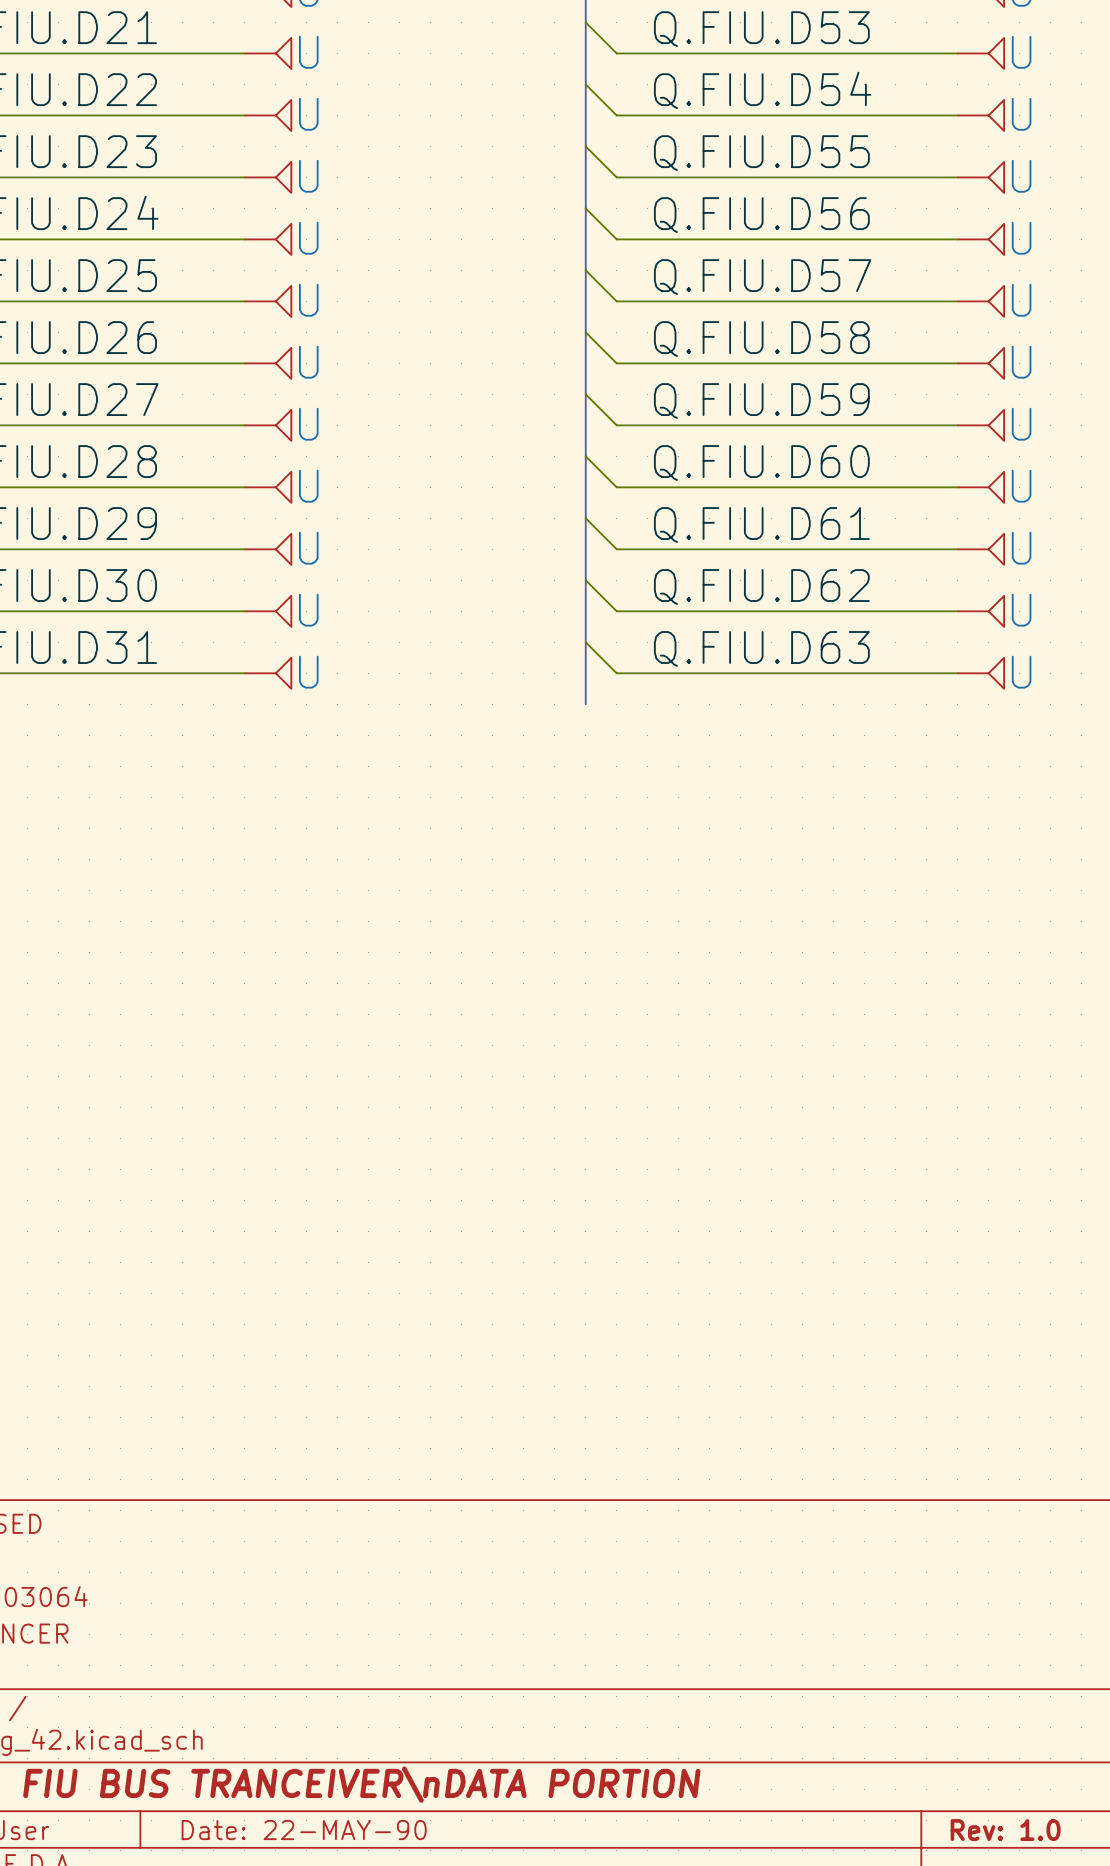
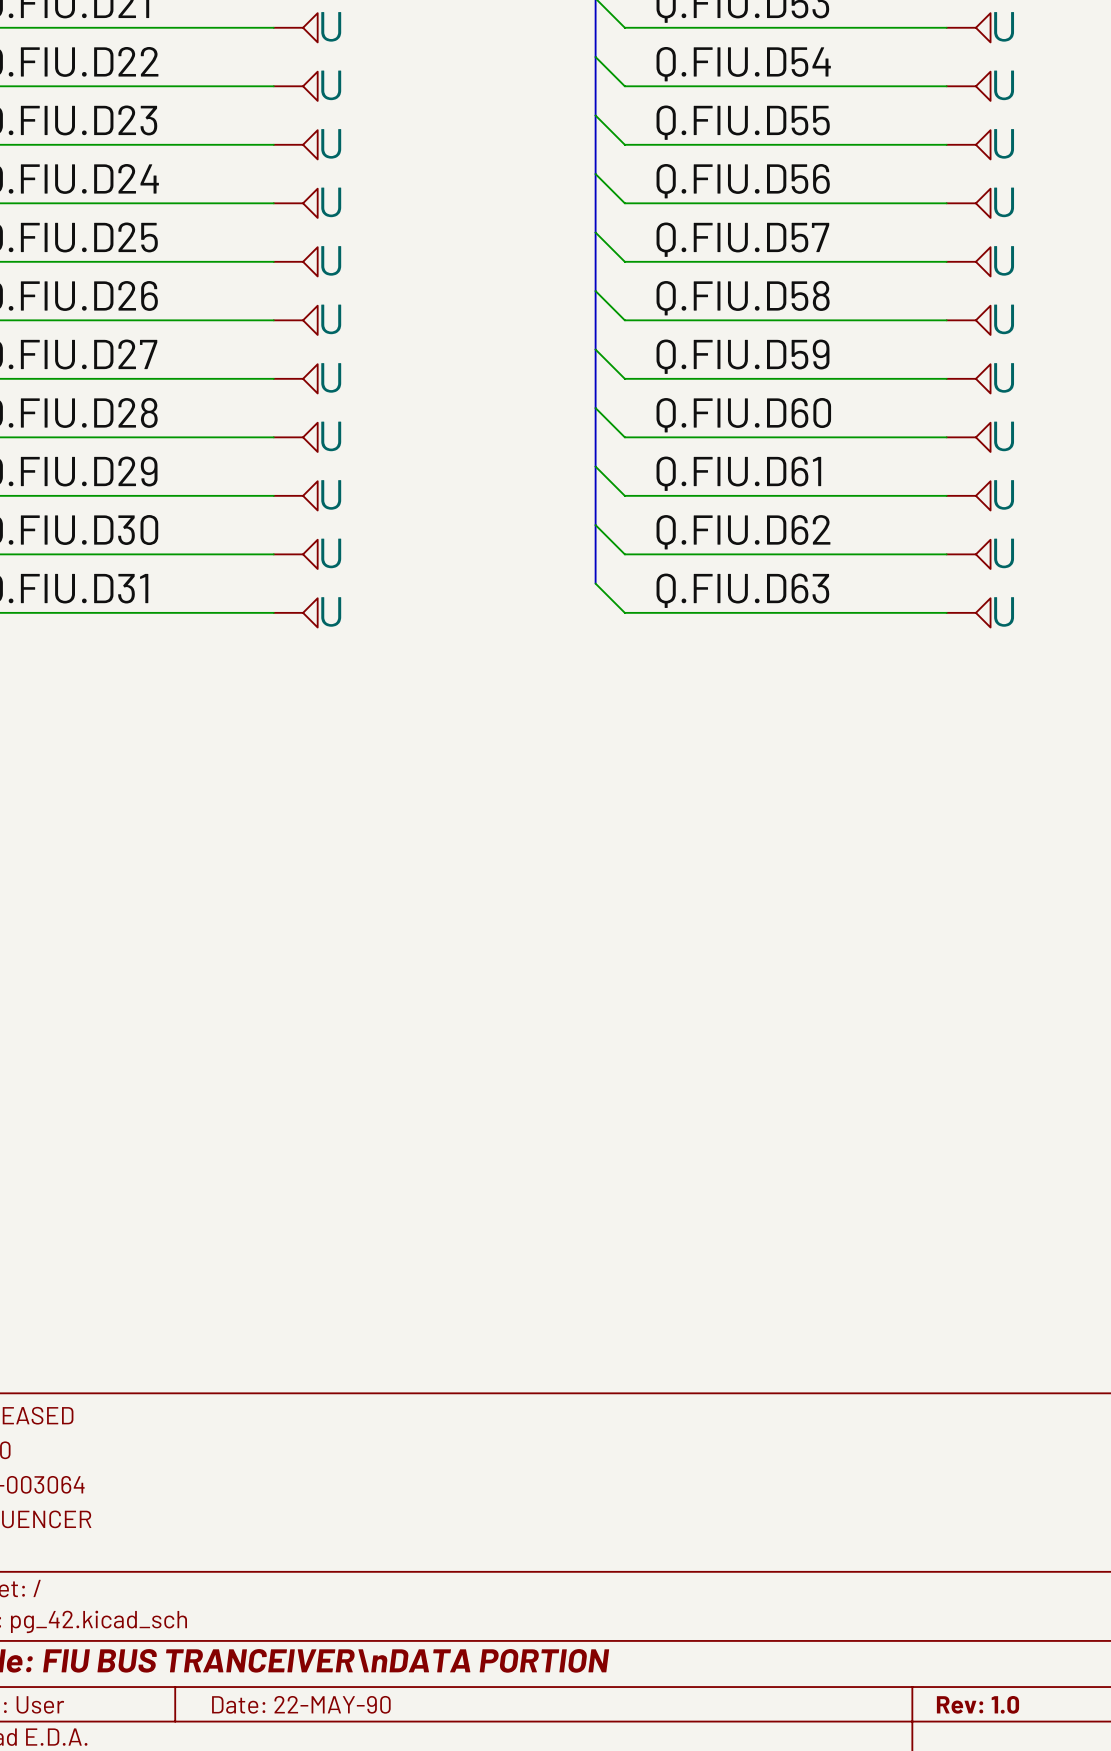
bus: (585, 642) (585, 704) -> none

